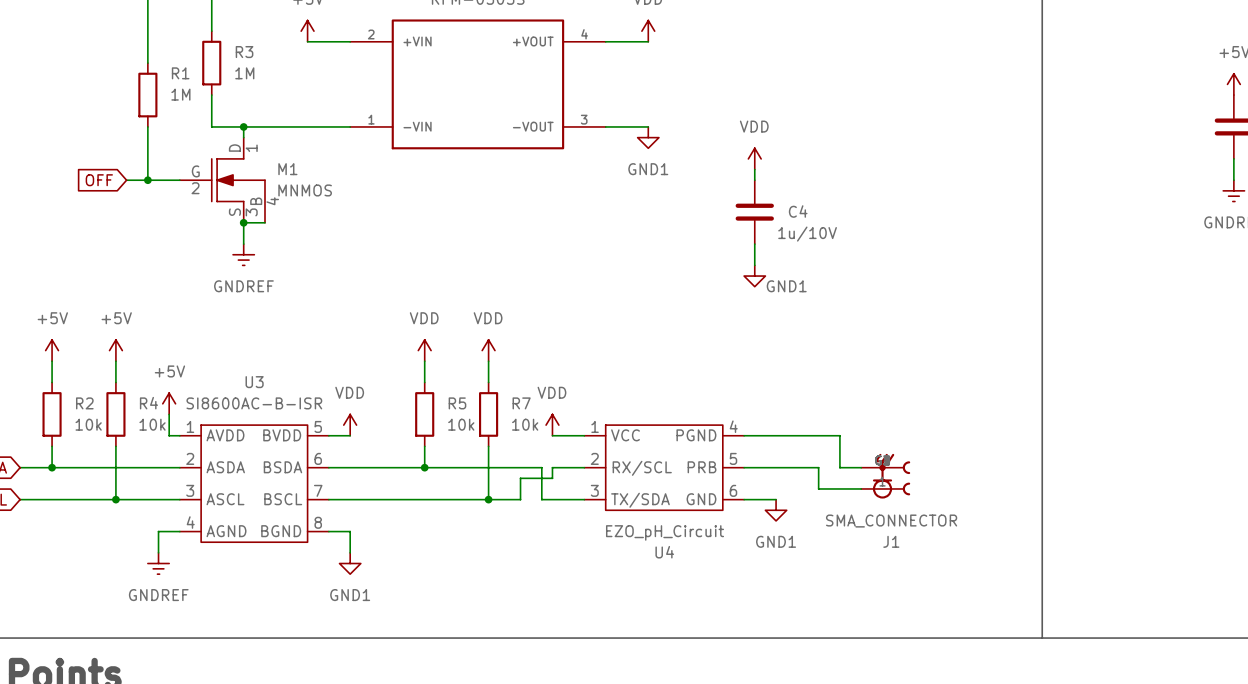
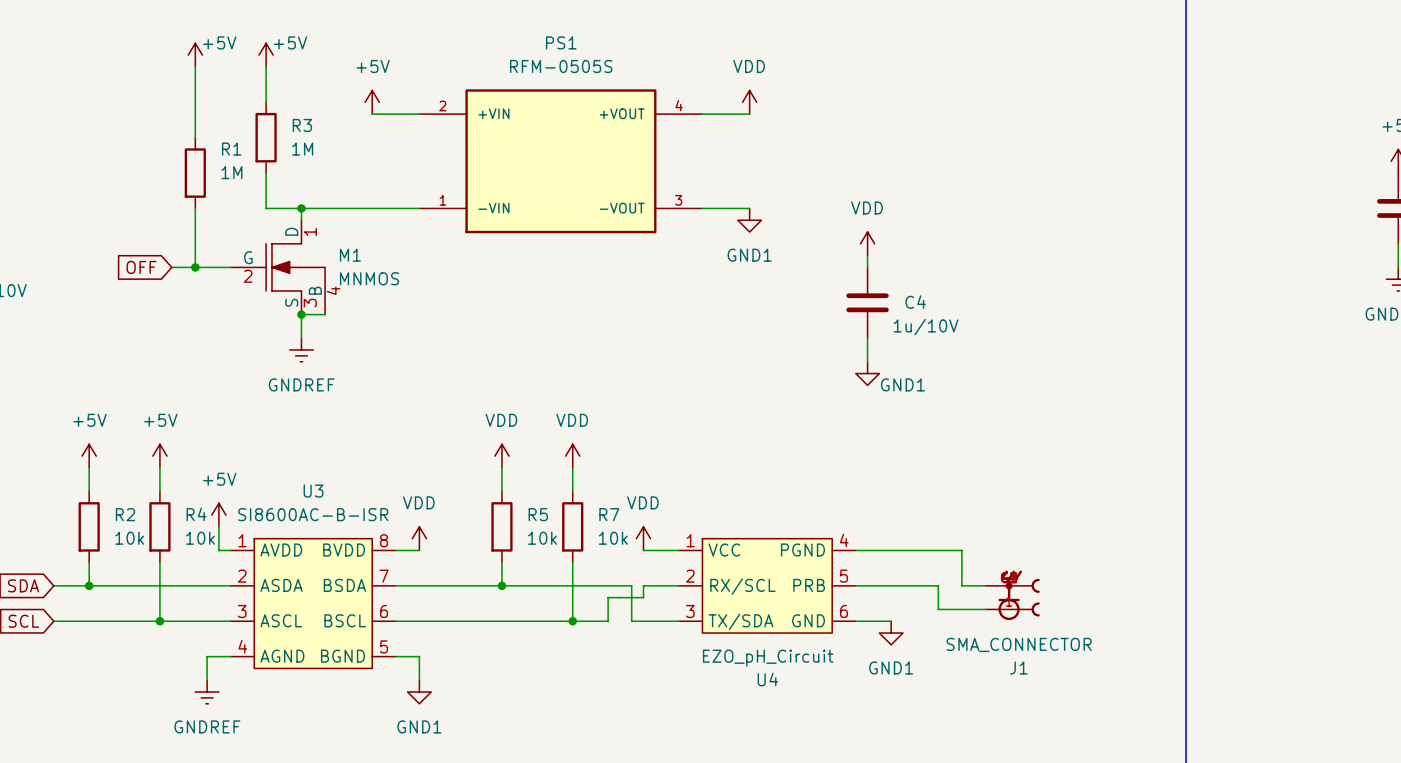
U3 pin number: 5 (318, 426) -> 8 (384, 540)
U3 pin number: 6 (318, 458) -> 7 (384, 576)
U3 pin number: 7 (318, 490) -> 6 (384, 611)
U3 pin number: 8 (318, 522) -> 5 (384, 646)

